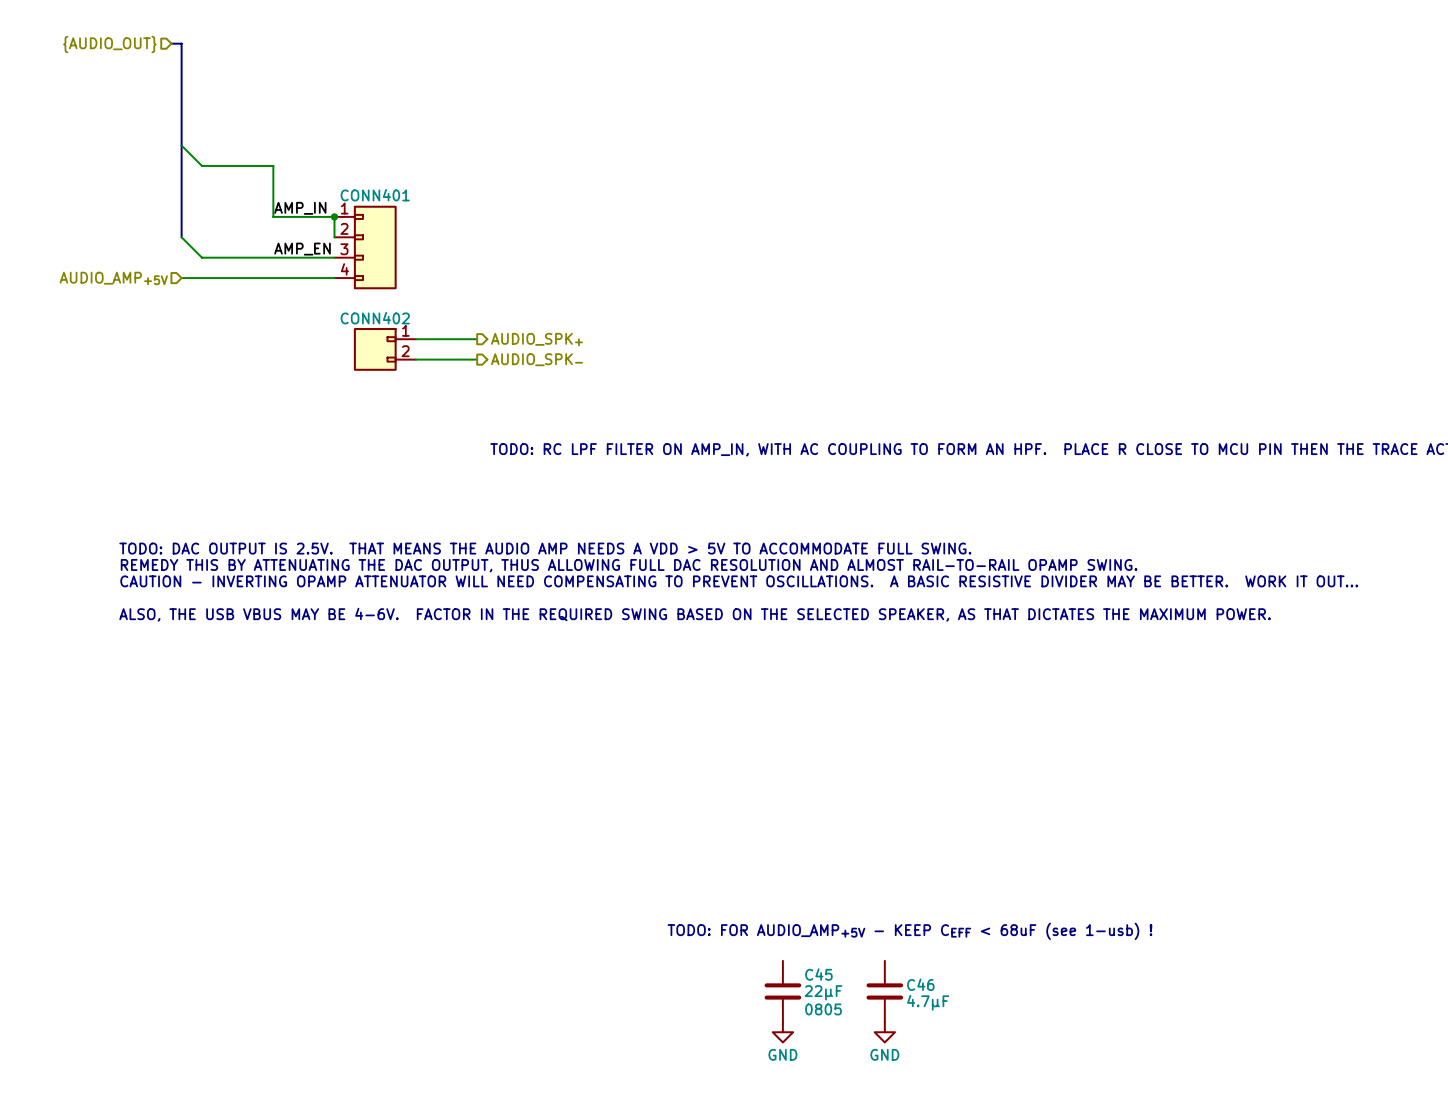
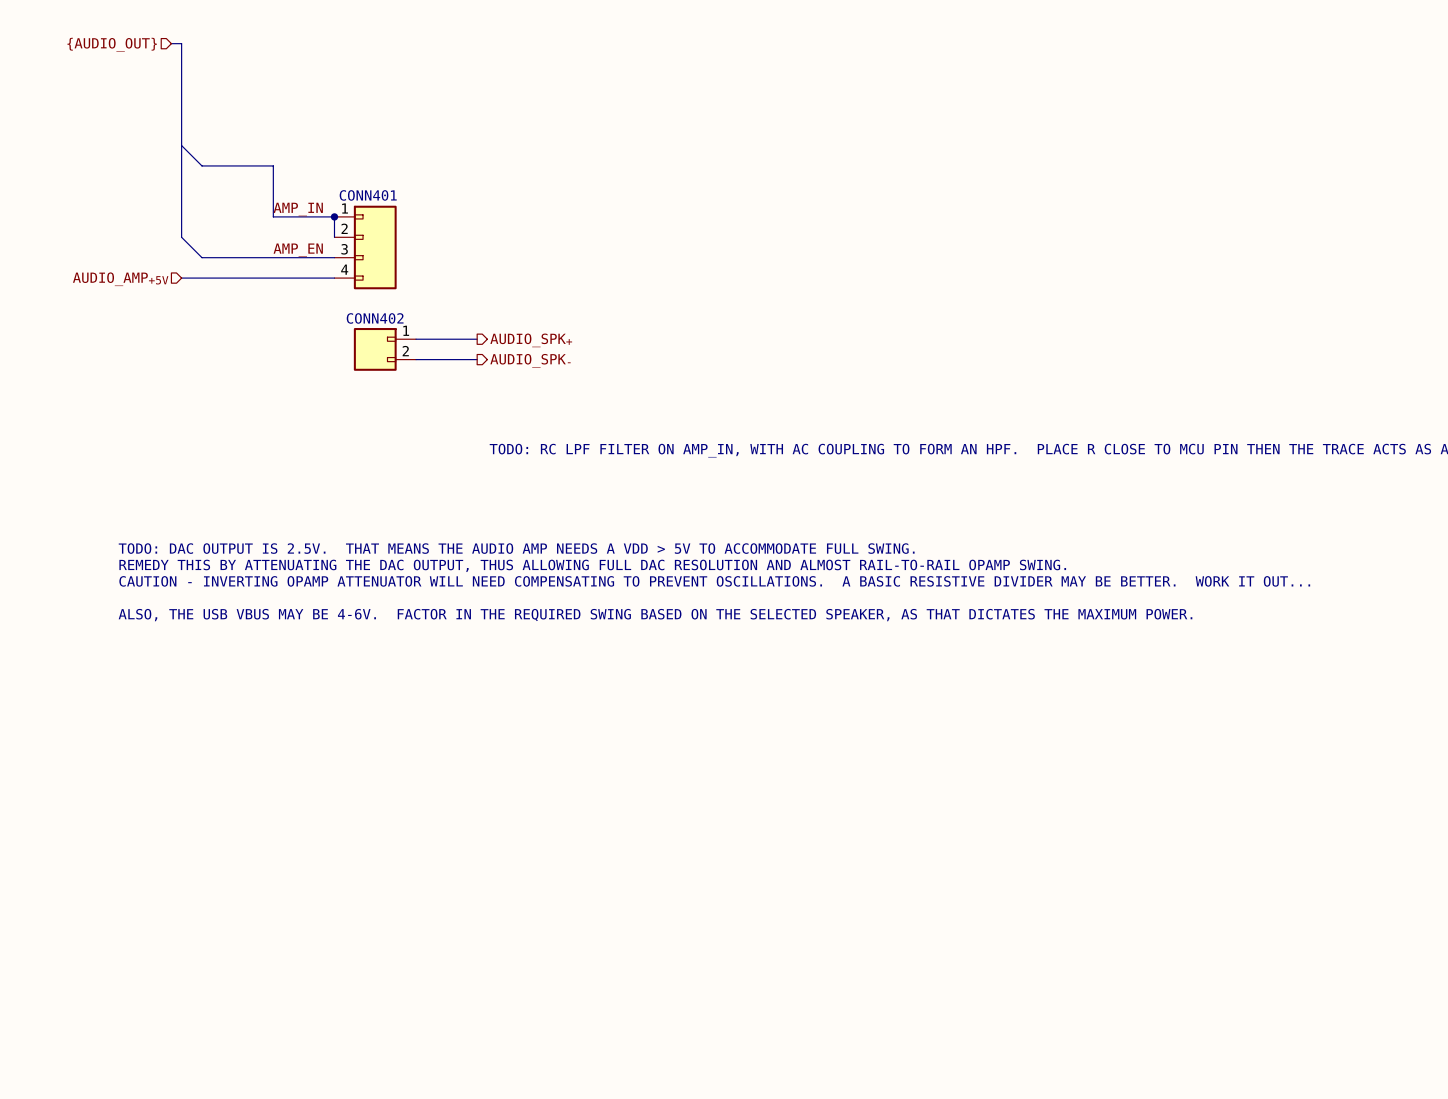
text: TODO: FOR AUDIO_AMP+5V - KEEP CEFF < 68uF (see 1-usb) ! (910, 931) -> none
C45: 22μF (782, 991) -> none
C46: 4.7μF (884, 991) -> none
power symbol: GND (782, 1032) -> none
power symbol: GND (884, 1032) -> none

